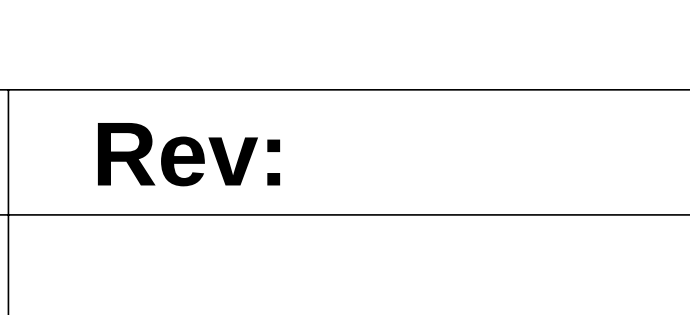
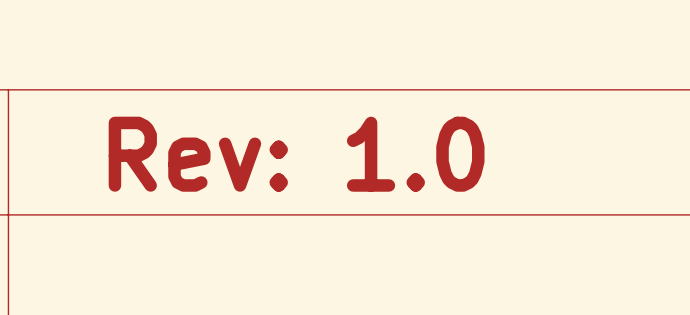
title block: Rev: (189, 154) -> Rev: 1.0 (296, 154)

